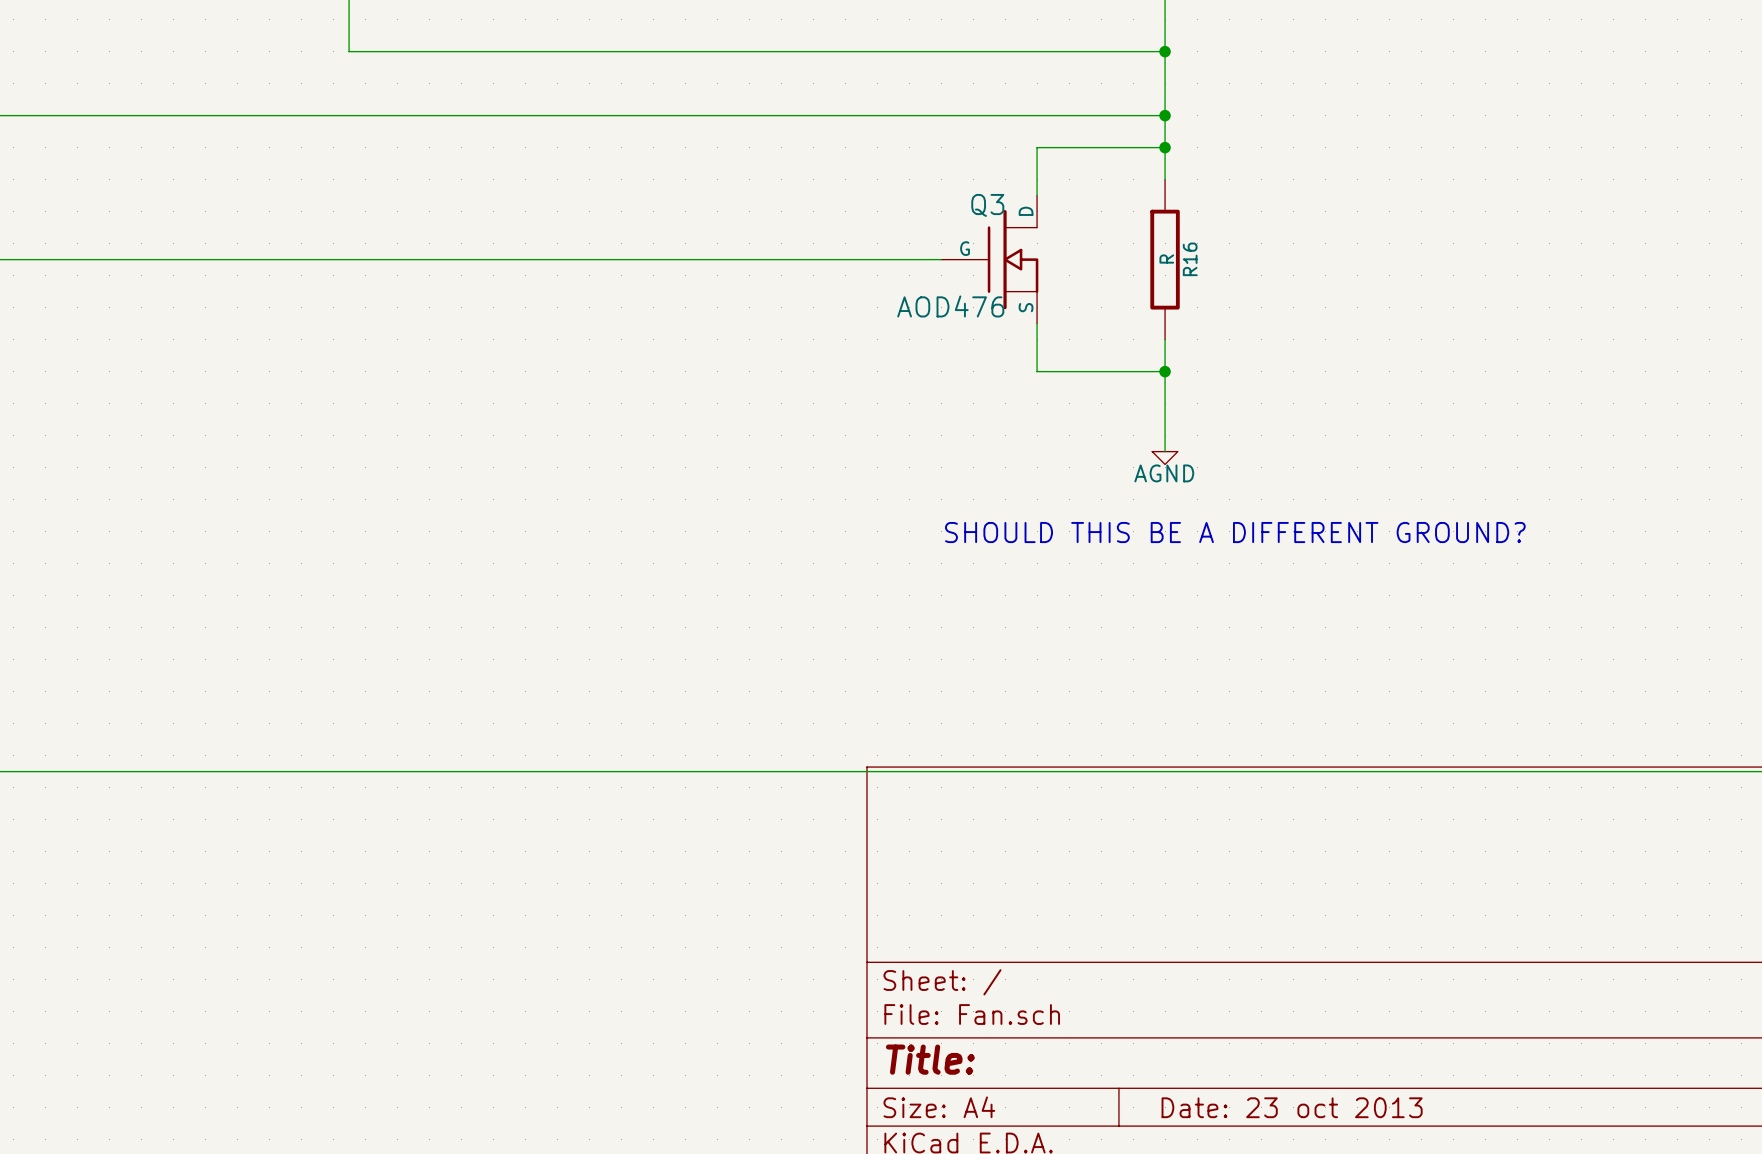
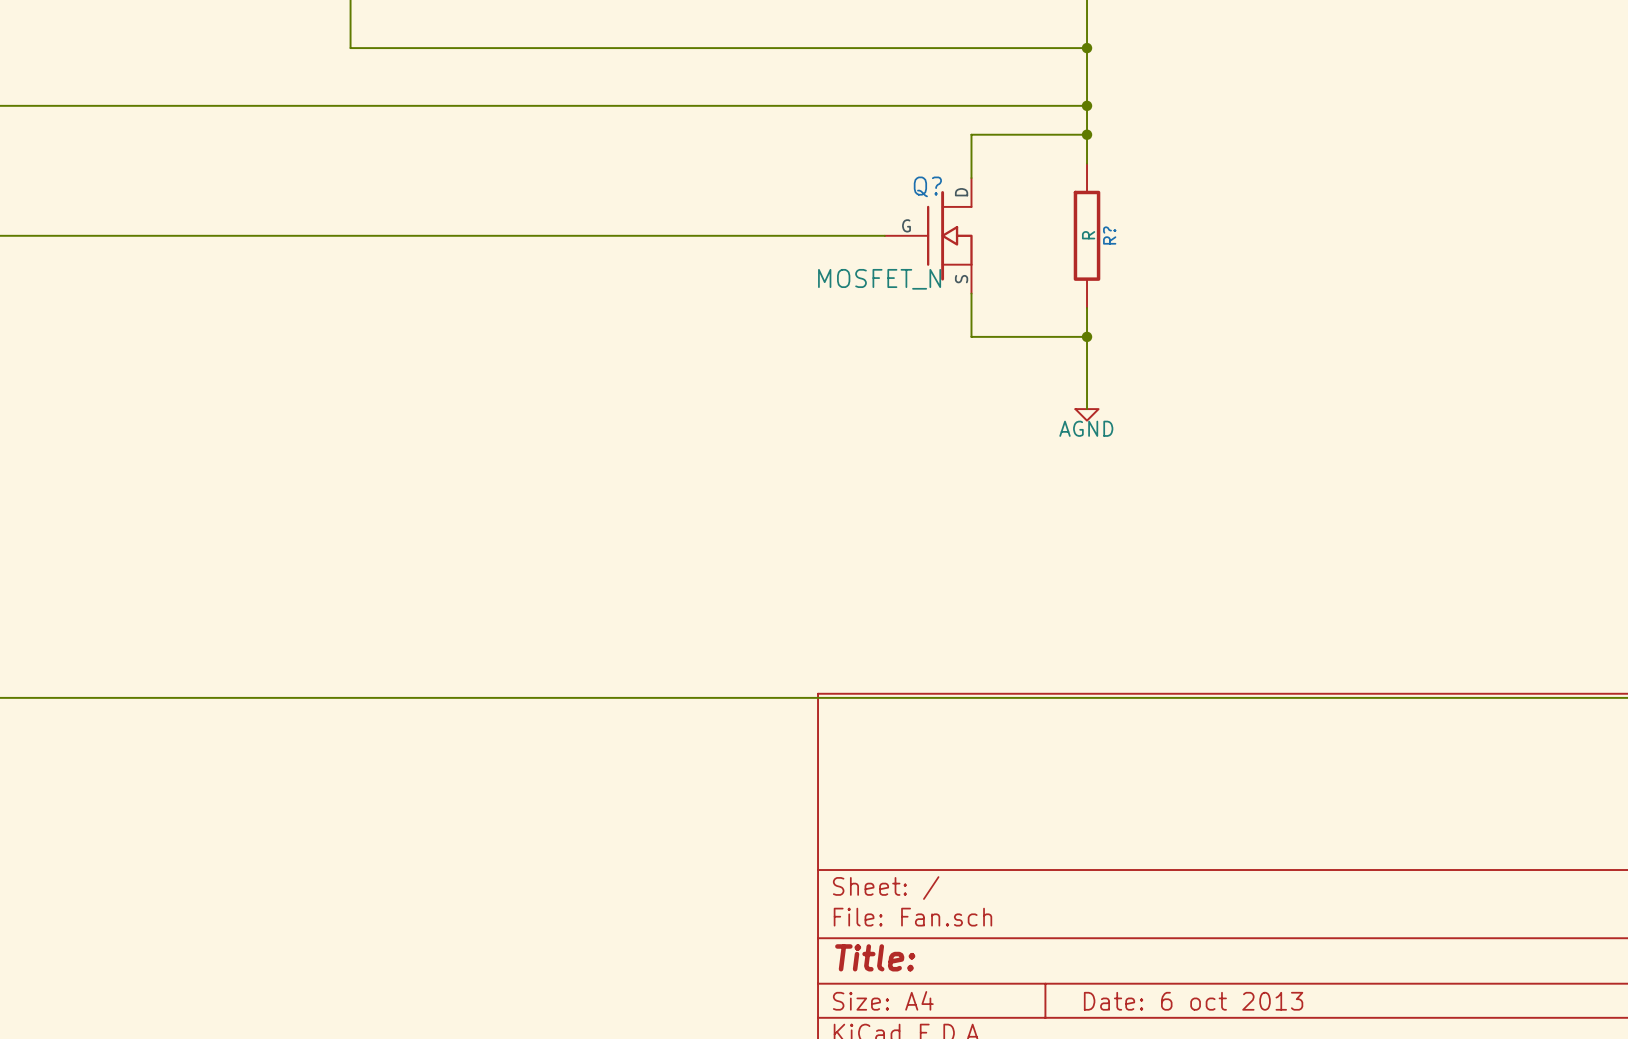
Q3 name: Q3 (987, 205) -> Q? (927, 186)
R16 name: R16 (1190, 259) -> R? (1109, 235)
Q3 value: AOD476 (950, 306) -> MOSFET_N (879, 279)
text: SHOULD THIS BE A DIFFERENT GROUND? (1235, 532) -> none
title block: Date: 23 oct 2013 (1292, 1107) -> Date: 6 oct 2013 (1193, 1001)

